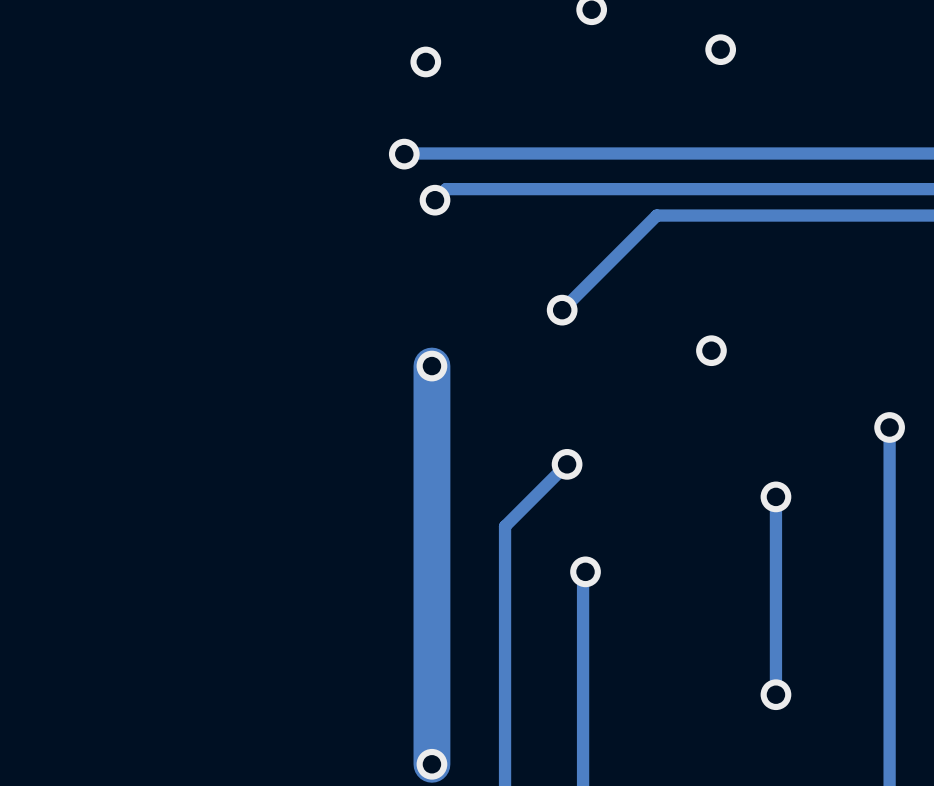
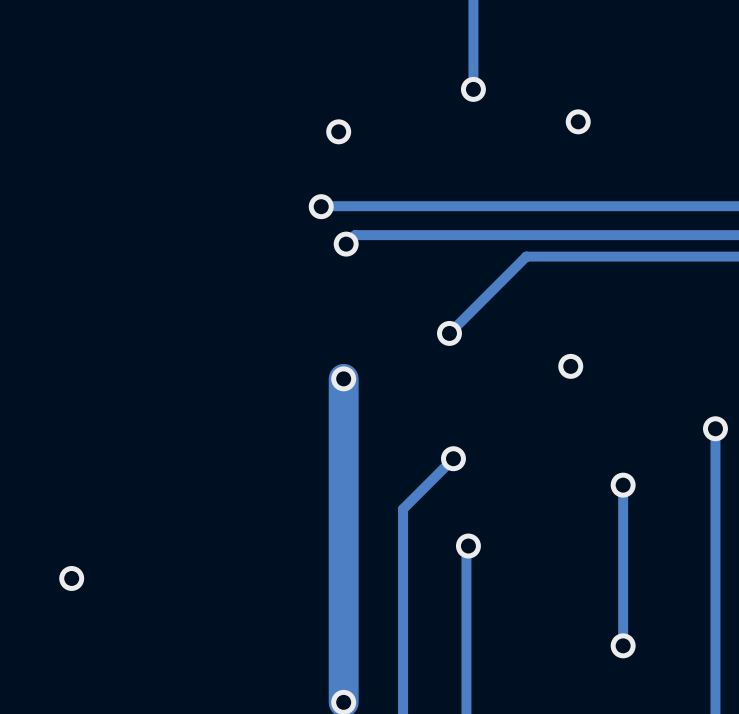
via: none -> (71, 578)

